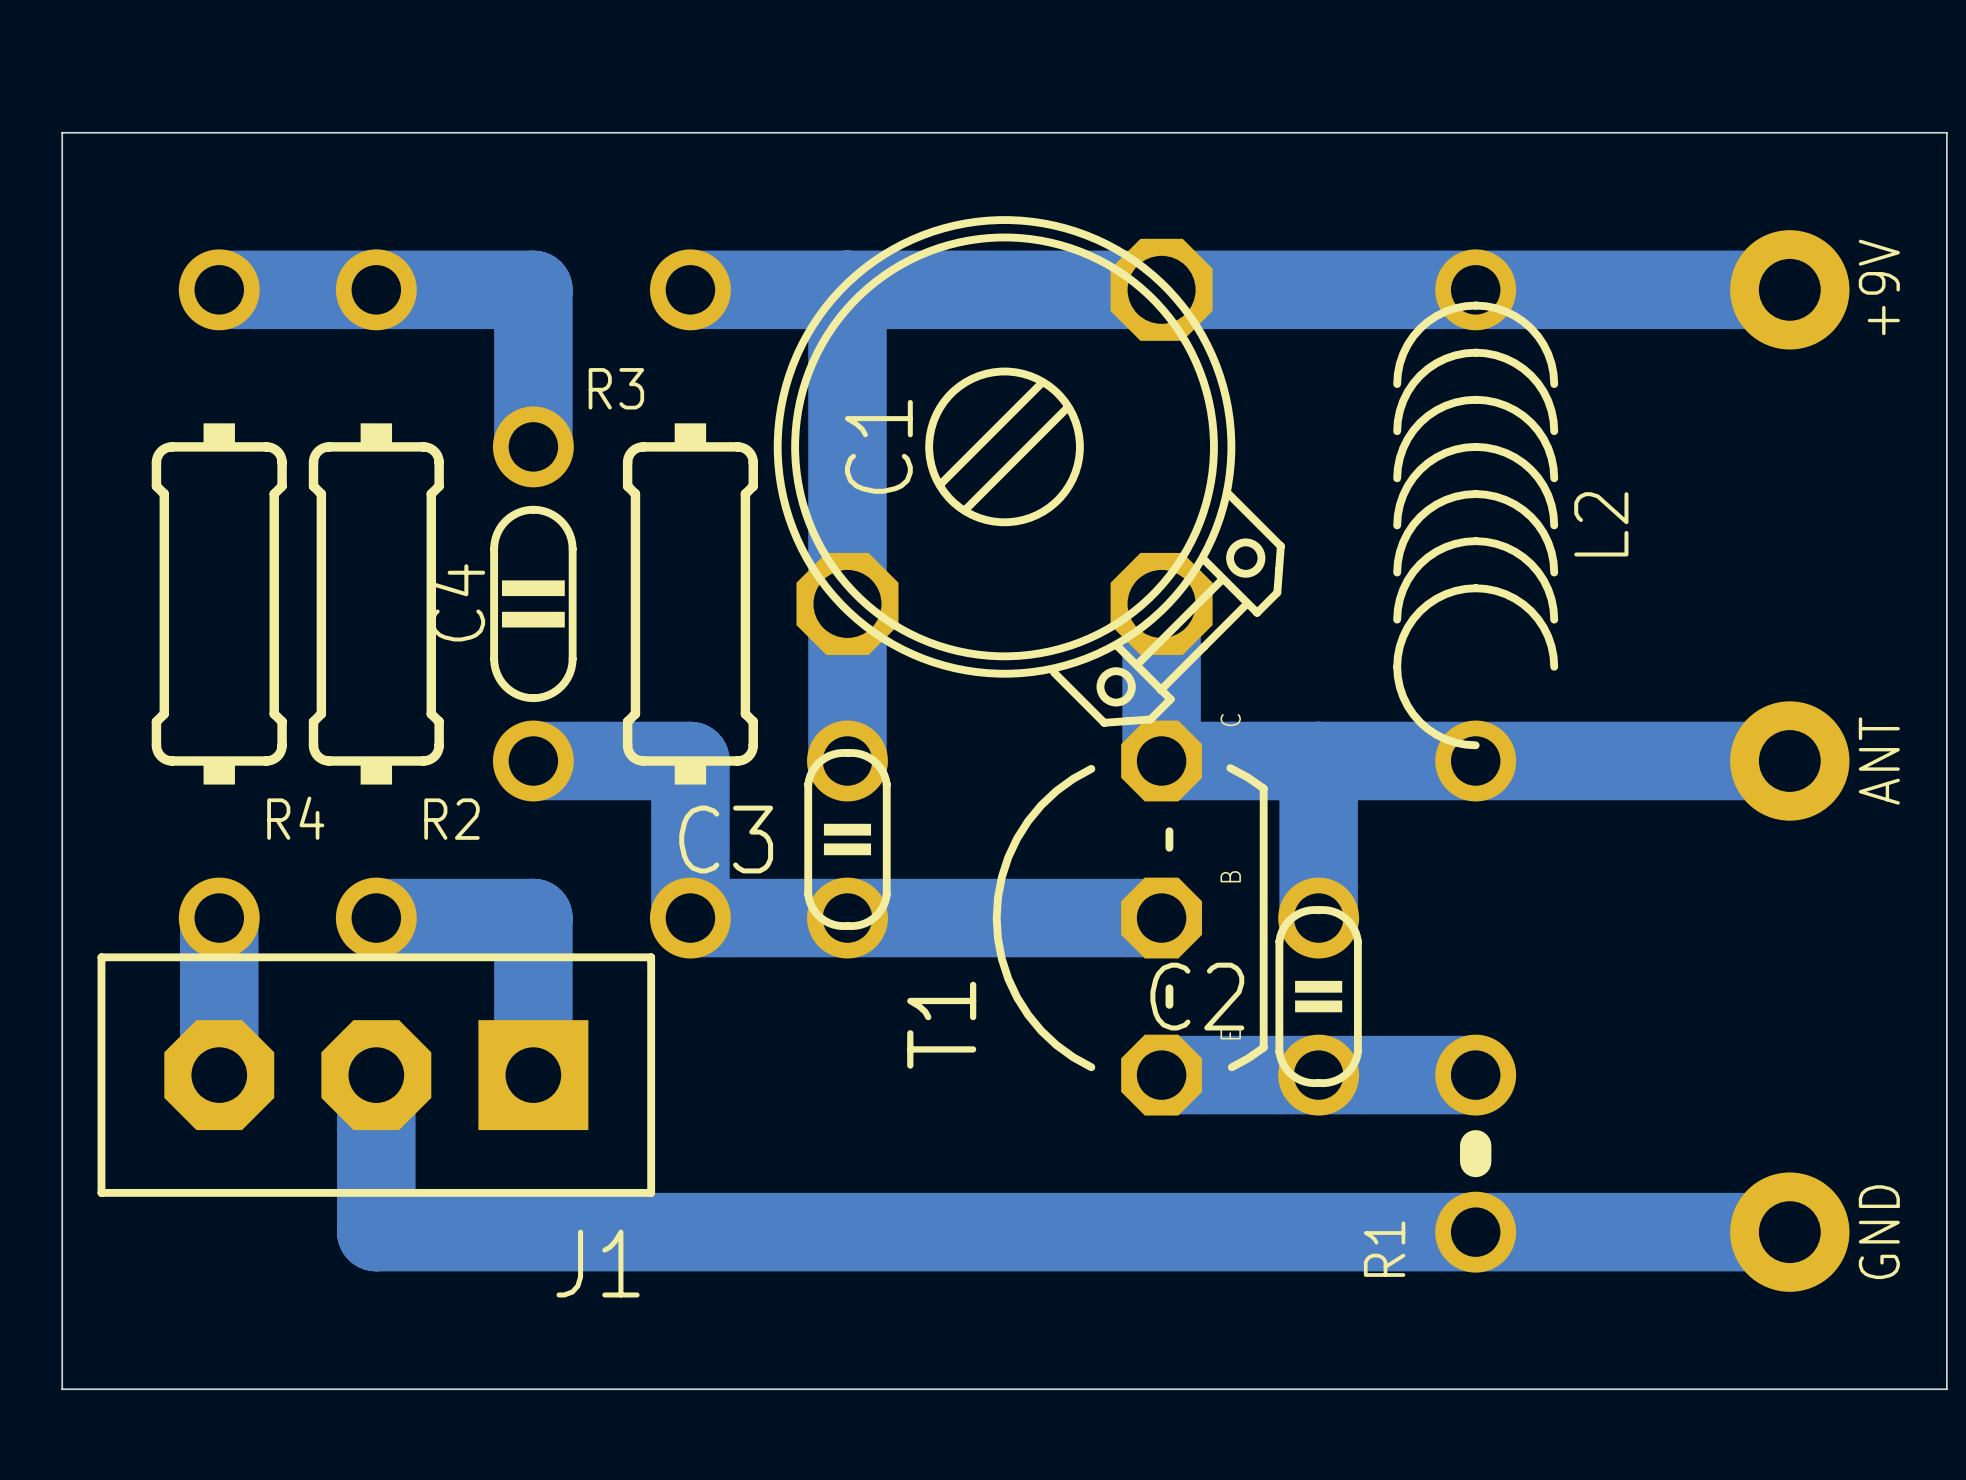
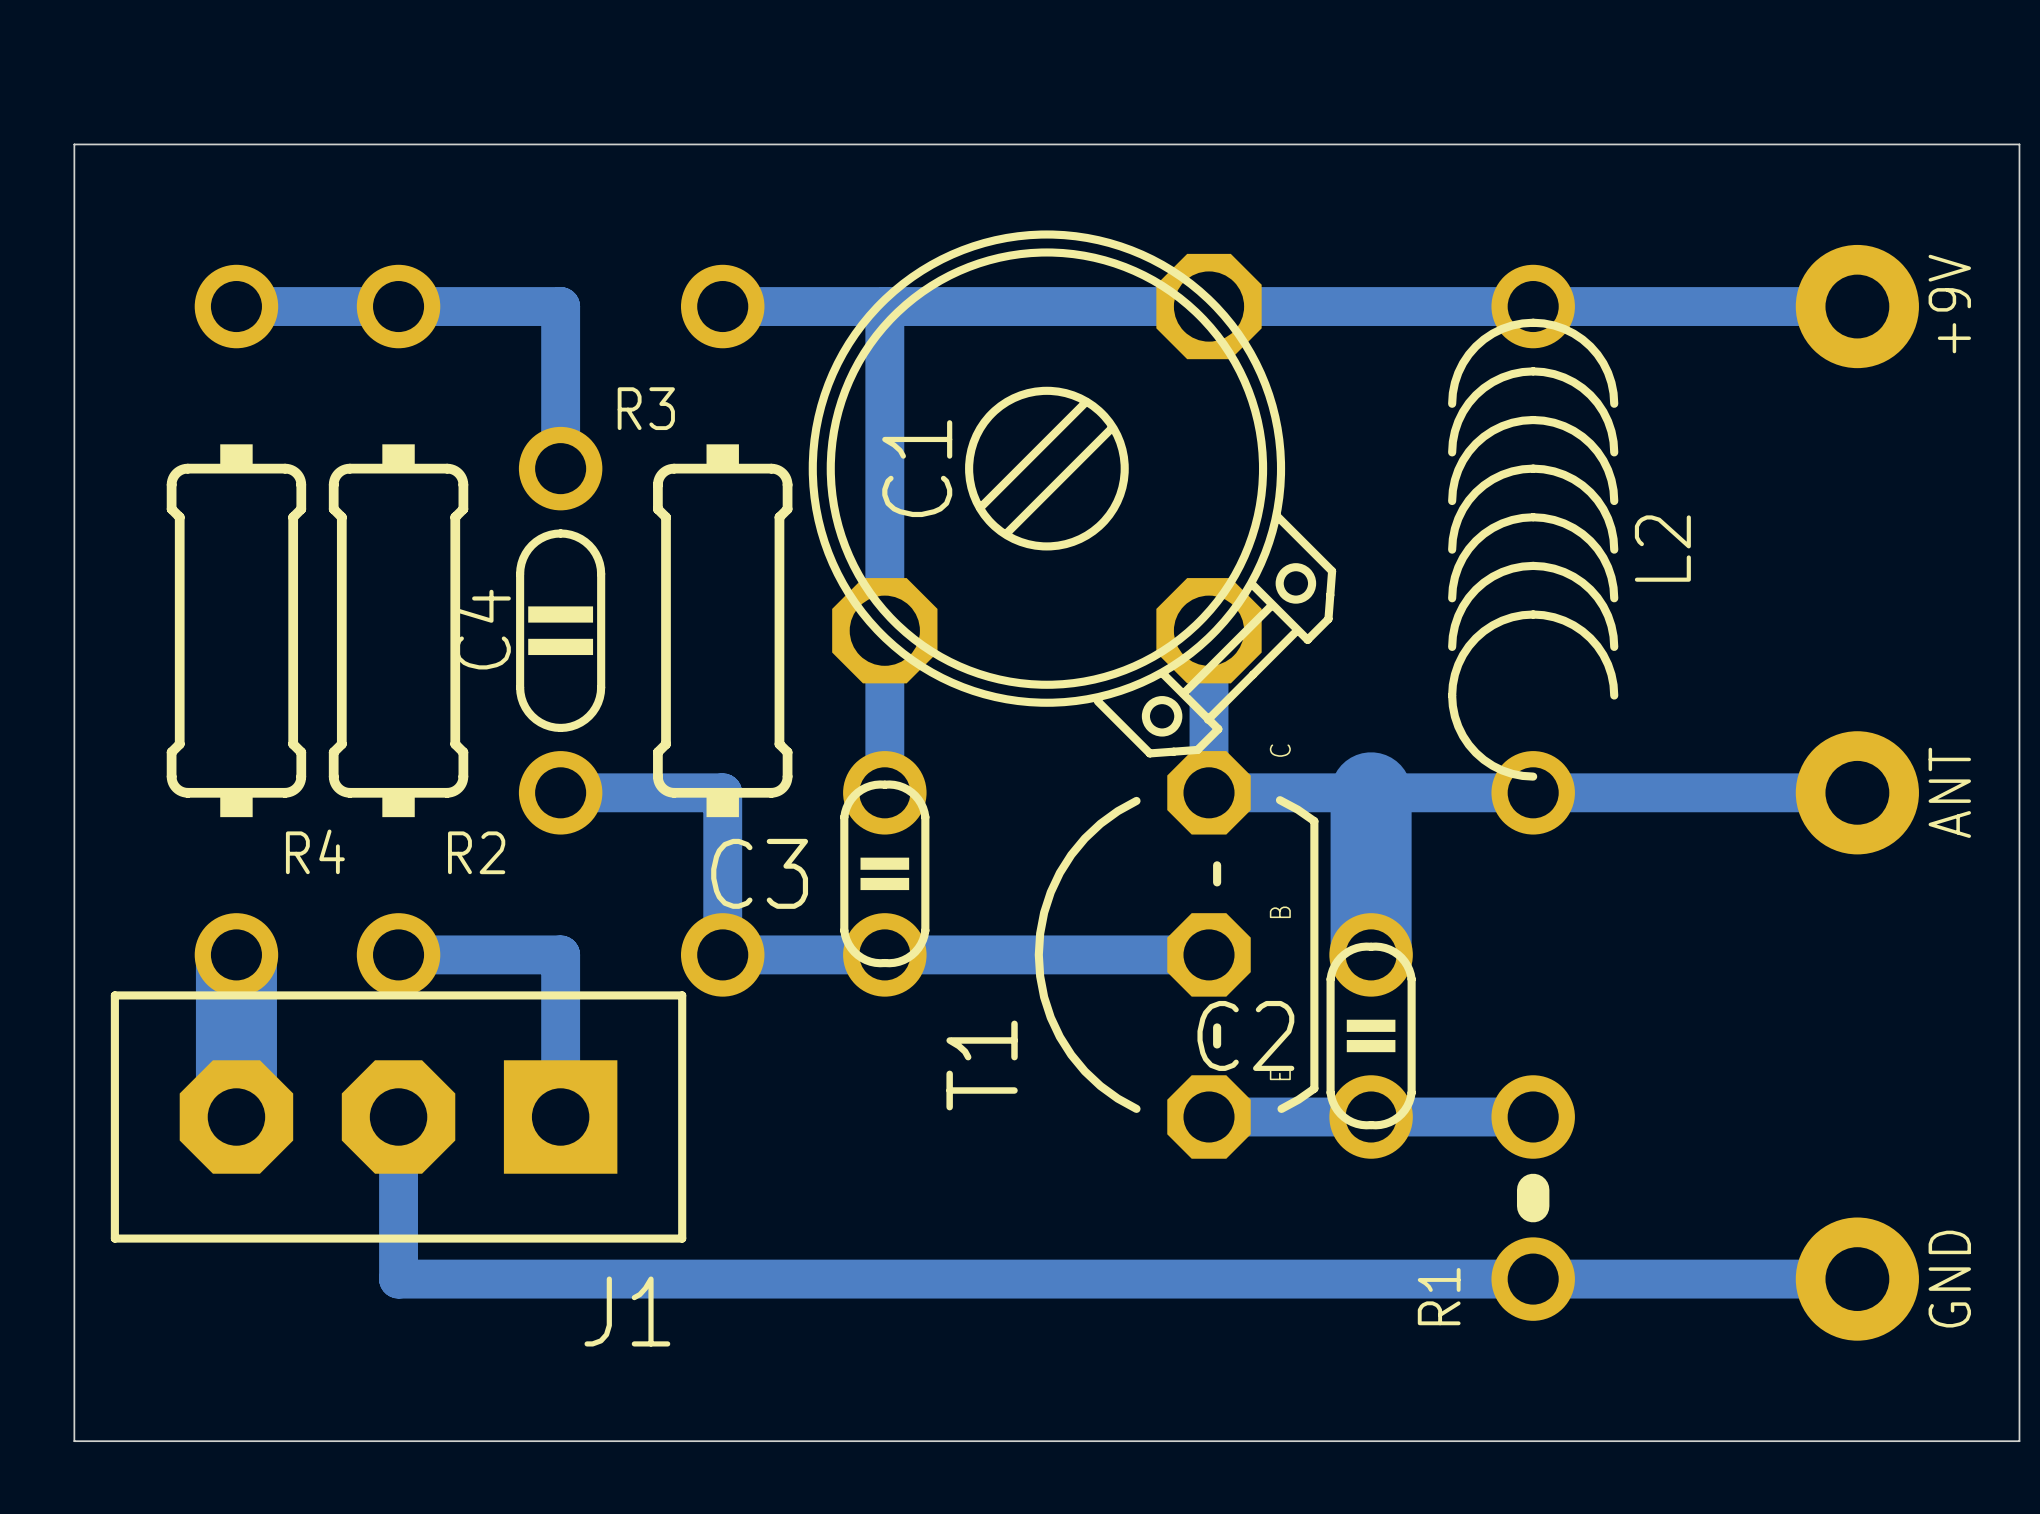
bottom track width: thick (219, 289) (533, 289) (533, 446) -> thin (236, 306) (560, 306) (560, 468)
bottom track width: thick (690, 289) (1789, 289) -> thin (722, 306) (1857, 306)
bottom track width: thick (847, 289) (847, 761) -> thin (884, 306) (884, 792)
bottom track width: thick (1161, 603) (1161, 761) (1789, 761) -> thin (1209, 630) (1209, 792) (1857, 792)
bottom track width: thick (533, 761) (690, 761) (690, 918) (1161, 918) -> thin (560, 792) (722, 792) (722, 954) (1209, 954)
bottom track width: thick (376, 918) (533, 918) (533, 1075) -> thin (398, 954) (560, 954) (560, 1117)
bottom track width: thick (376, 1075) (376, 1232) (1789, 1232) -> thin (398, 1117) (398, 1279) (1857, 1279)
bottom track width: thick (1161, 1075) (1475, 1075) -> thin (1209, 1117) (1533, 1117)

